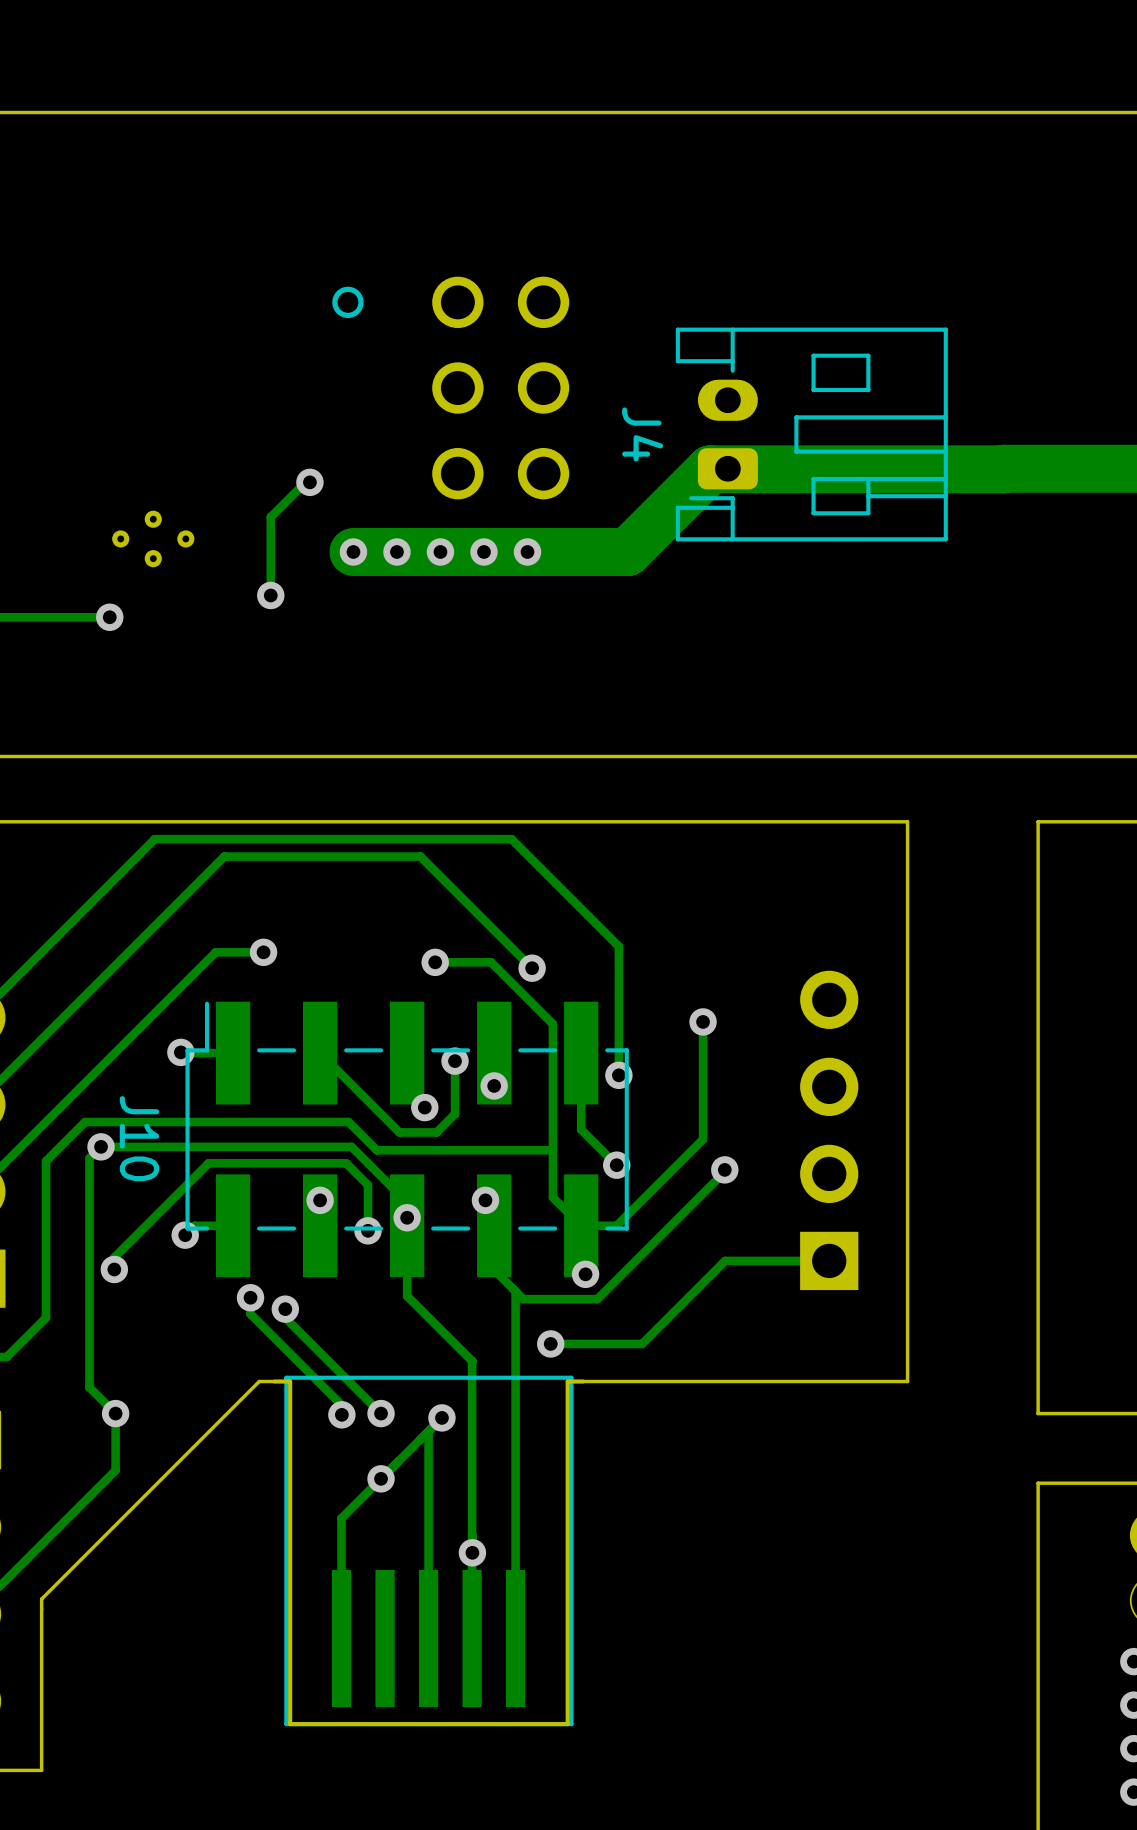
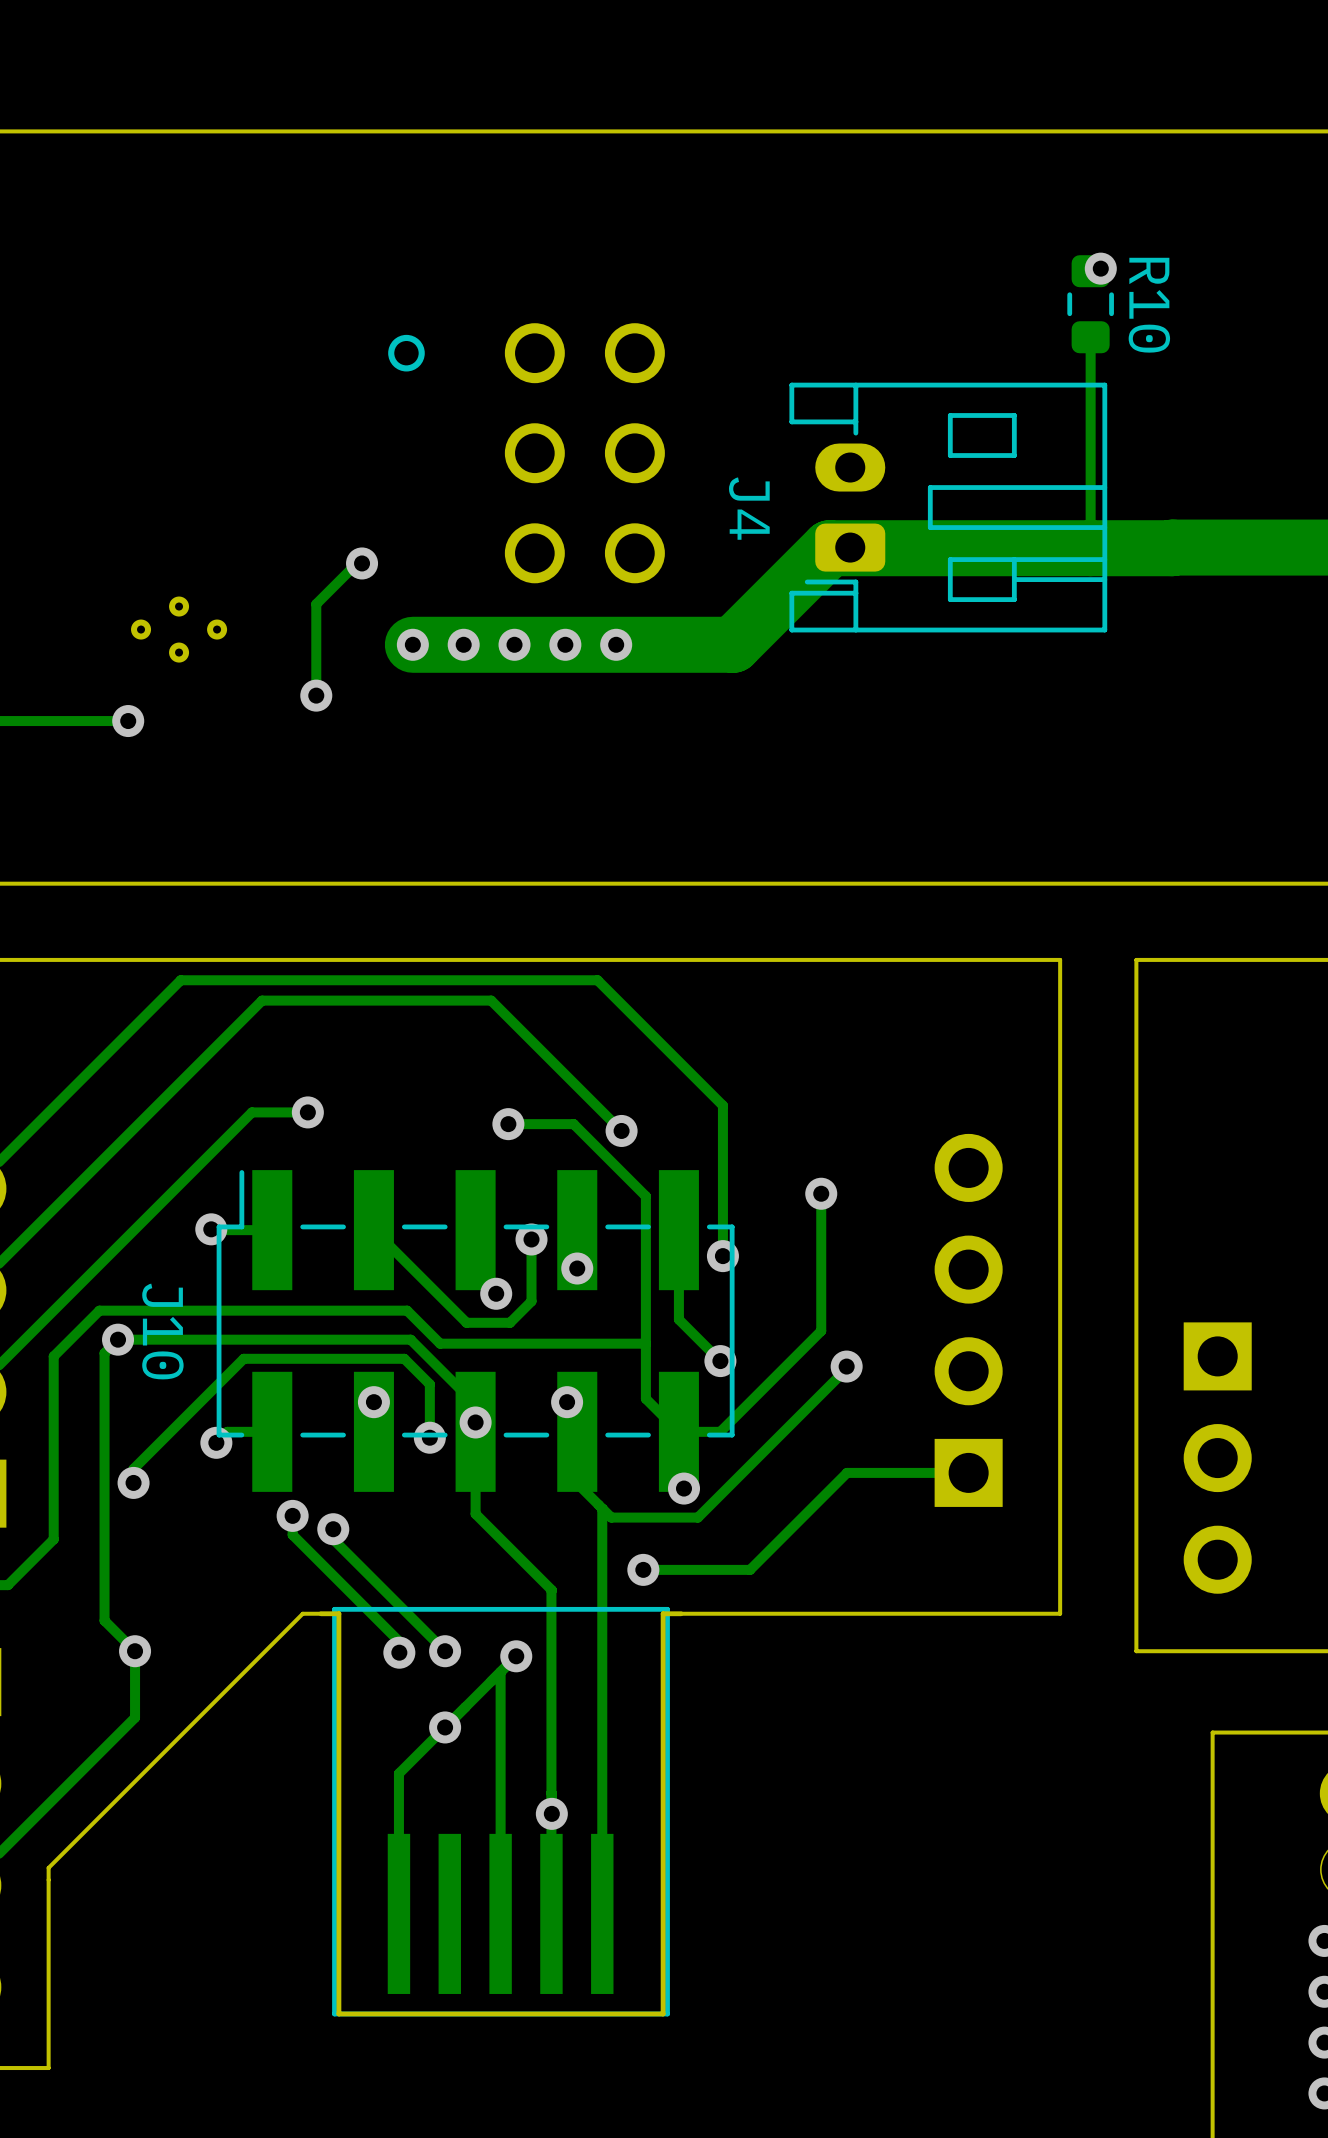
via: none -> (1100, 268)
R10: none -> (1090, 304)
track: none -> (1090, 337) (1090, 548)
board edge: (1038, 821) (1038, 1413) -> (1212, 959) (1136, 959) (1136, 1651) (1212, 1651)
part: none -> (1217, 1458)

